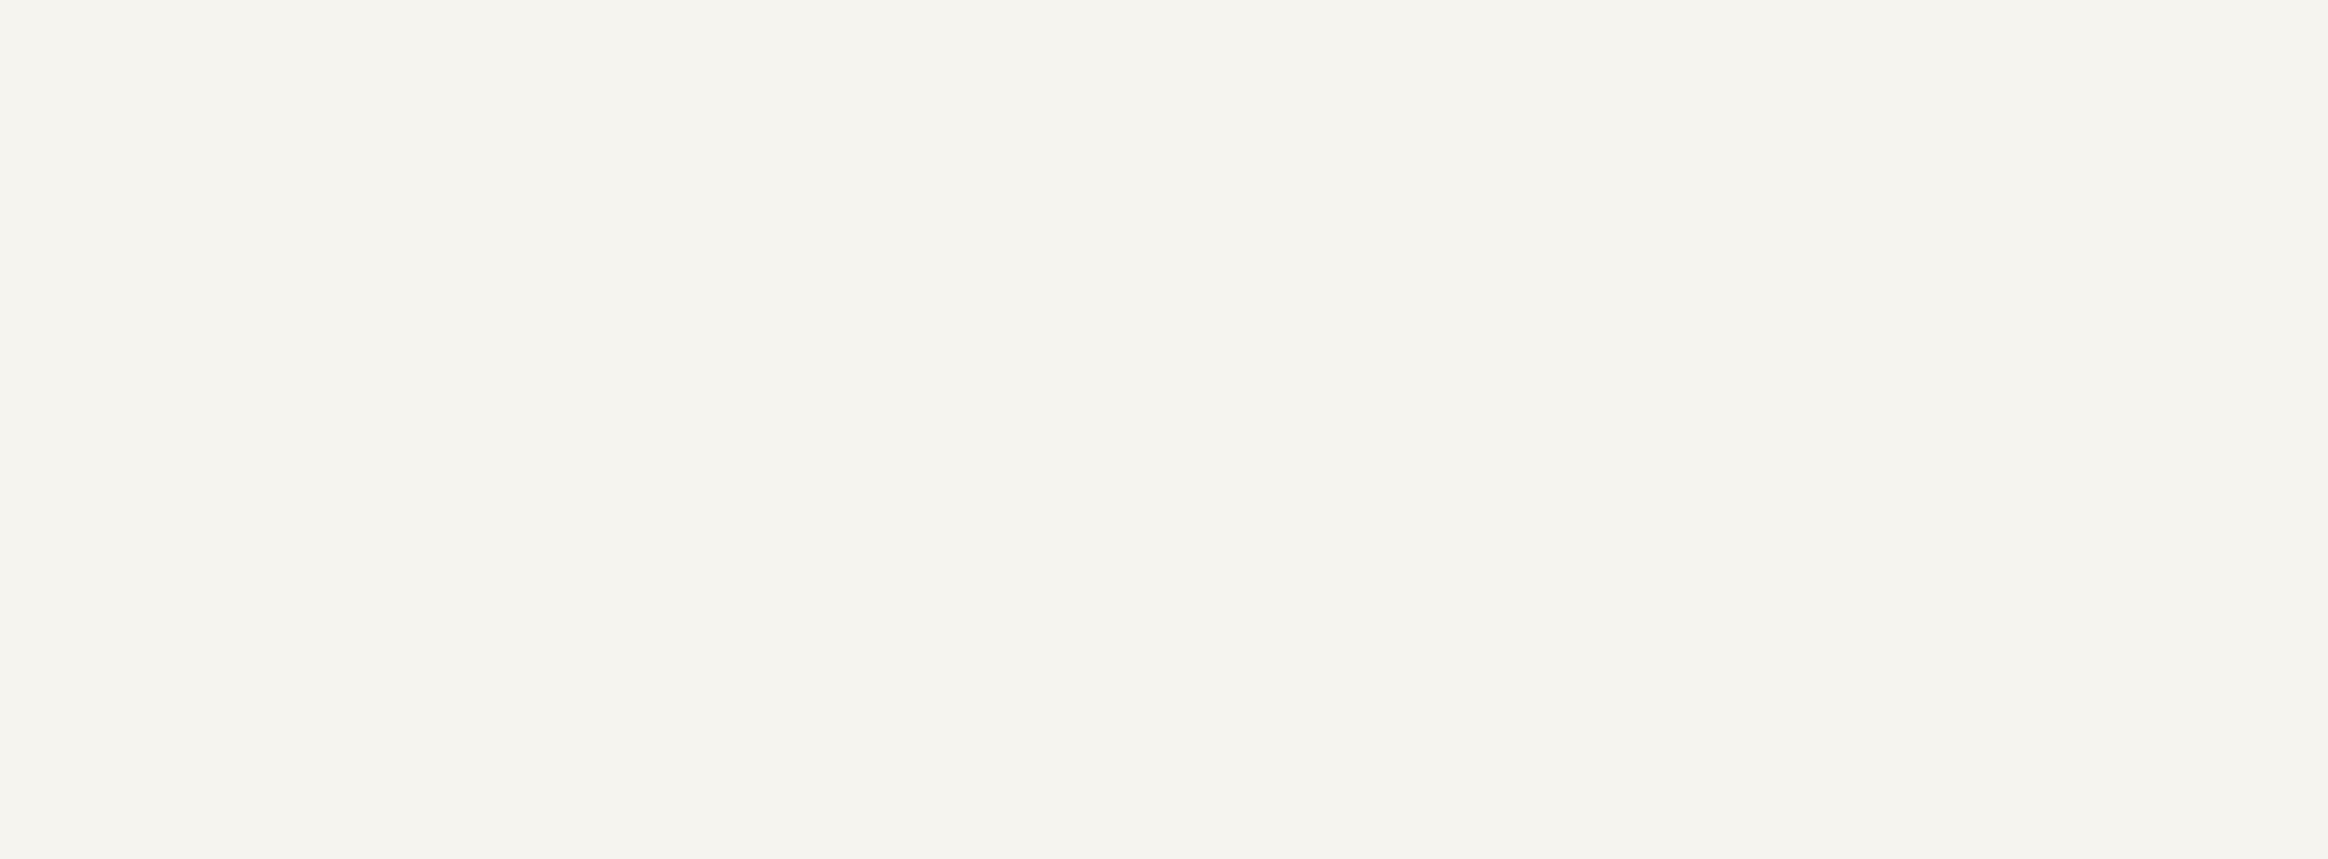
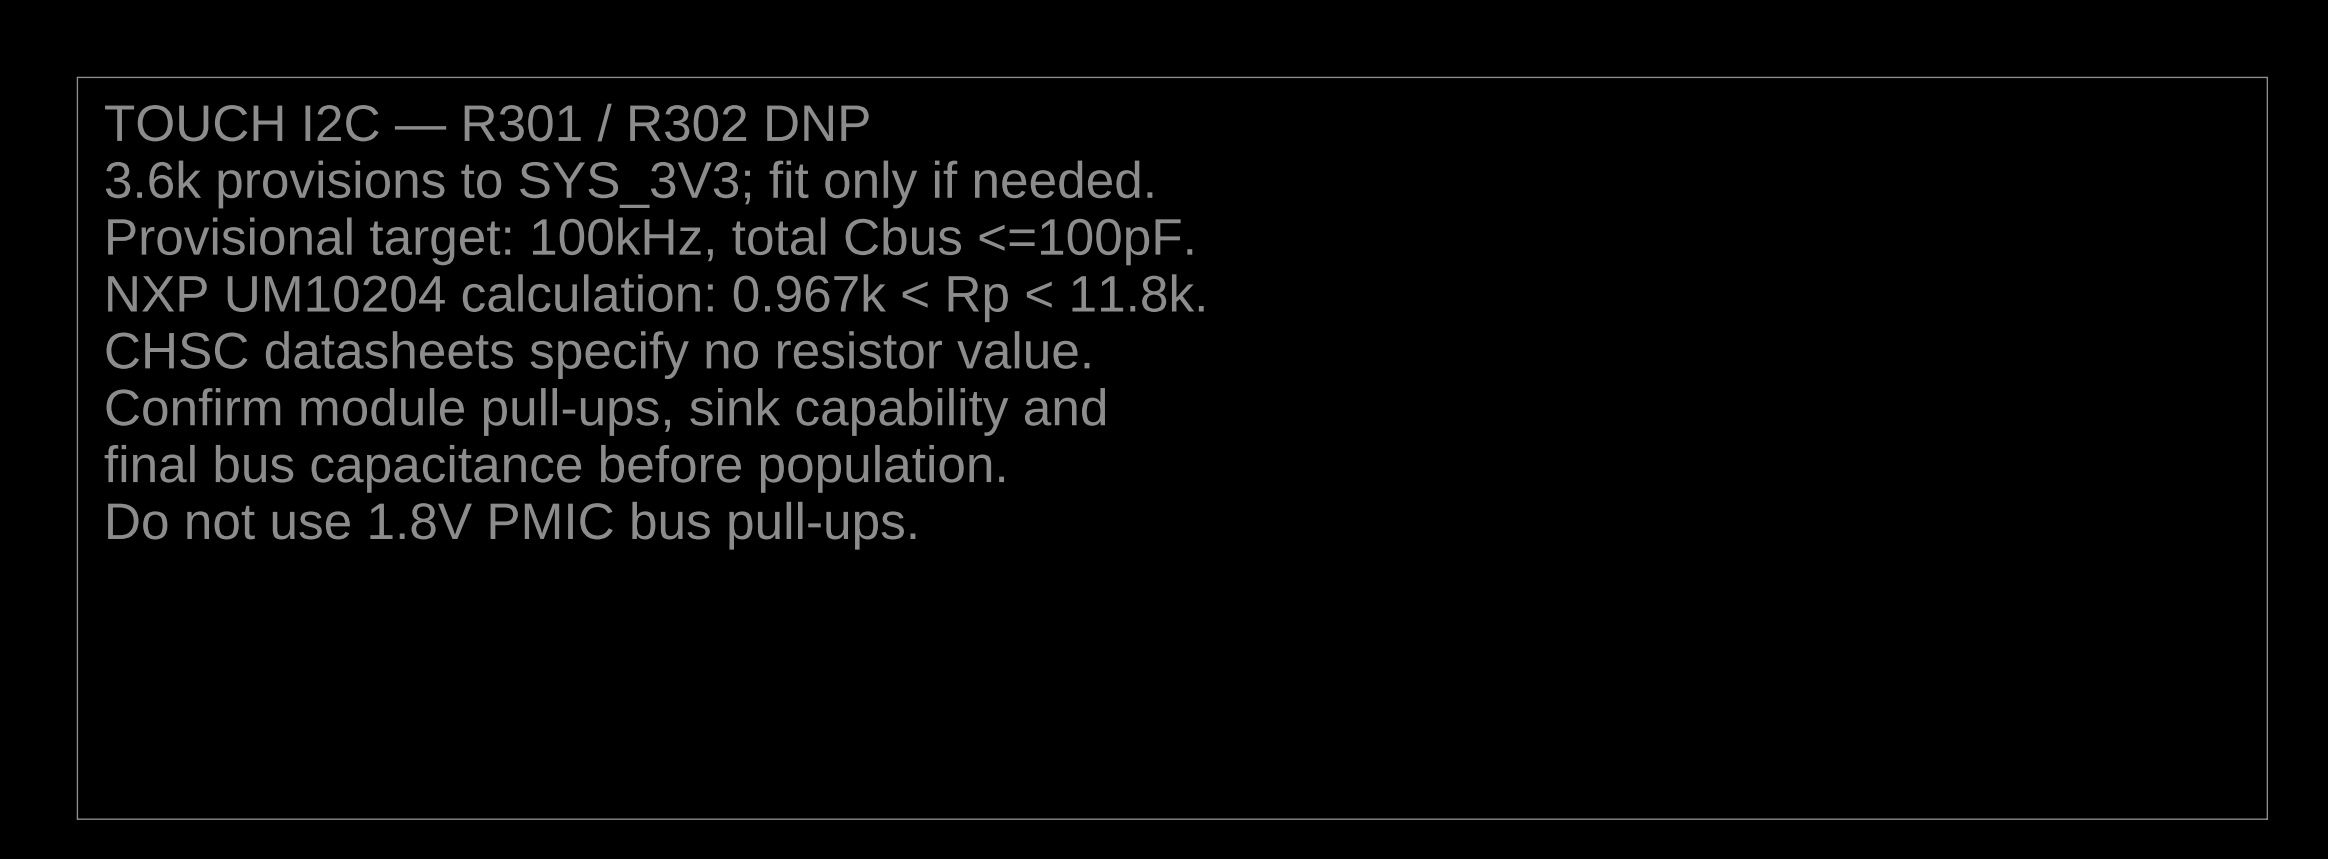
line: none -> (77, 77) (2267, 77) (2267, 819) (77, 819) (77, 77)
text: none -> TOUCH I2C — R301 / R302 DNP (486, 122)
text: none -> 3.6k provisions to SYS_3V3; fit only if needed. (629, 184)
text: none -> Provisional target: 100kHz, total Cbus <=100pF. (650, 241)
text: none -> NXP UM10204 calculation: 0.967k < Rp < 11.8k. (655, 298)
text: none -> CHSC datasheets specify no resistor value. (597, 355)
text: none -> Confirm module pull-ups, sink capability and (605, 411)
text: none -> final bus capacitance before population. (554, 468)
text: none -> Do not use 1.8V PMIC bus pull-ups. (511, 525)

